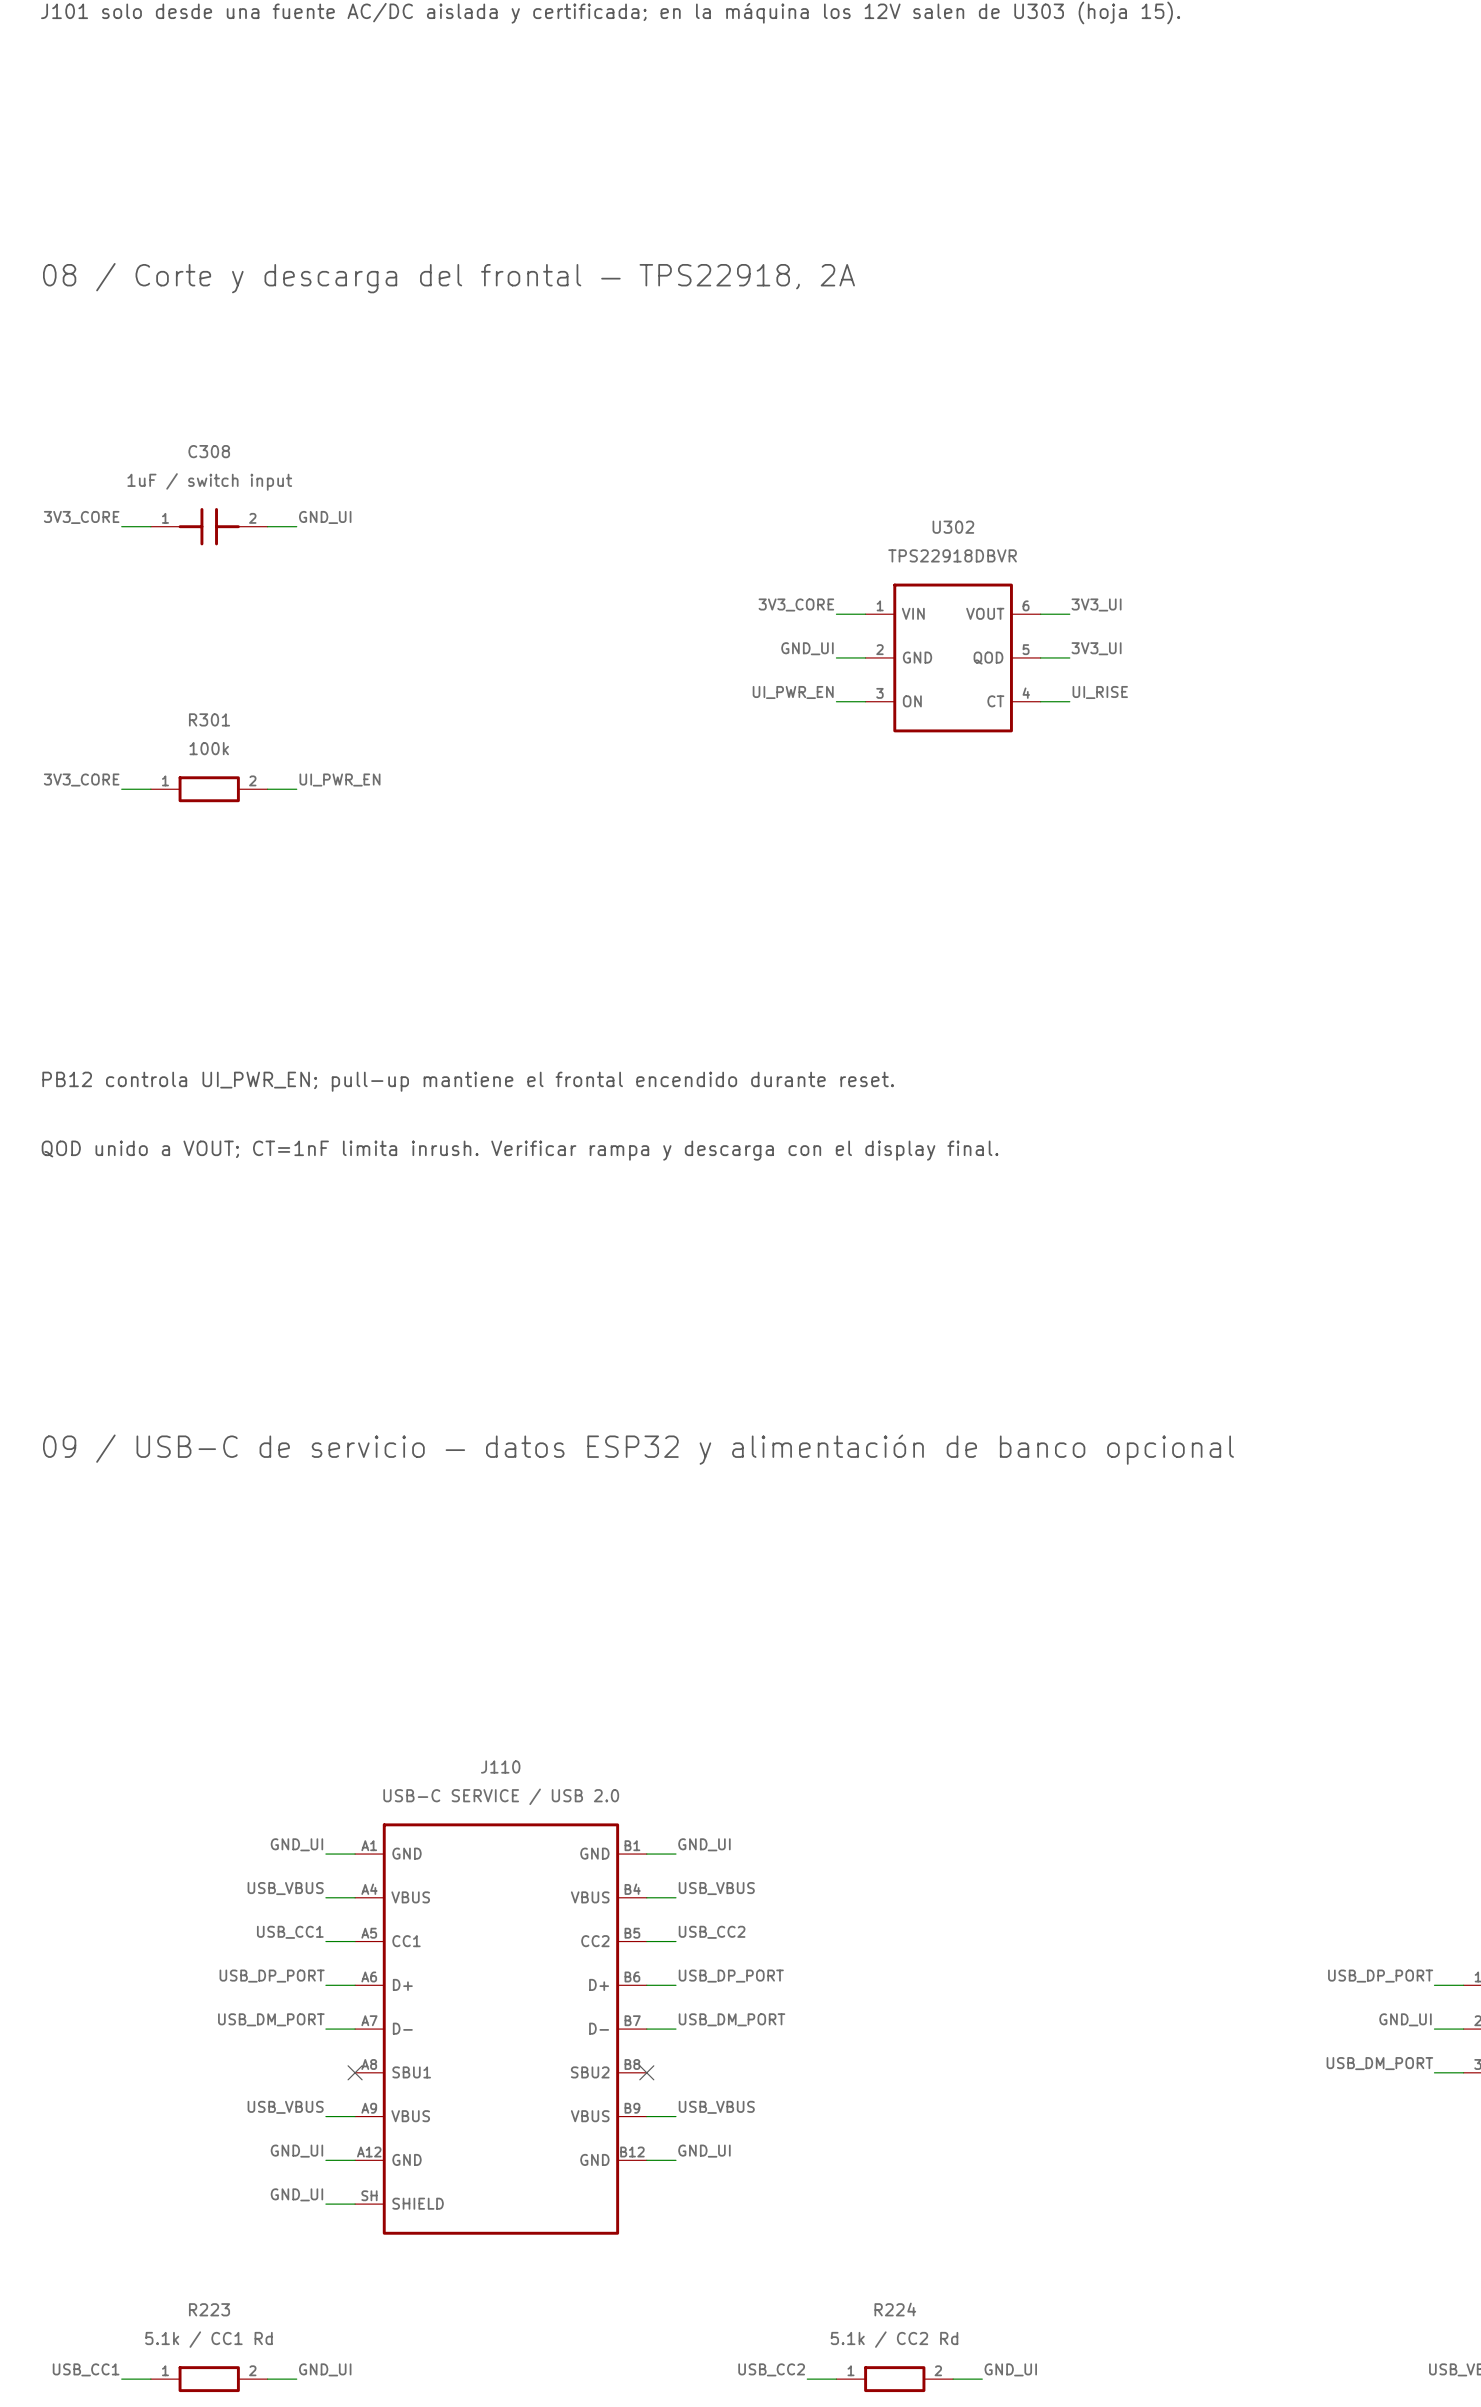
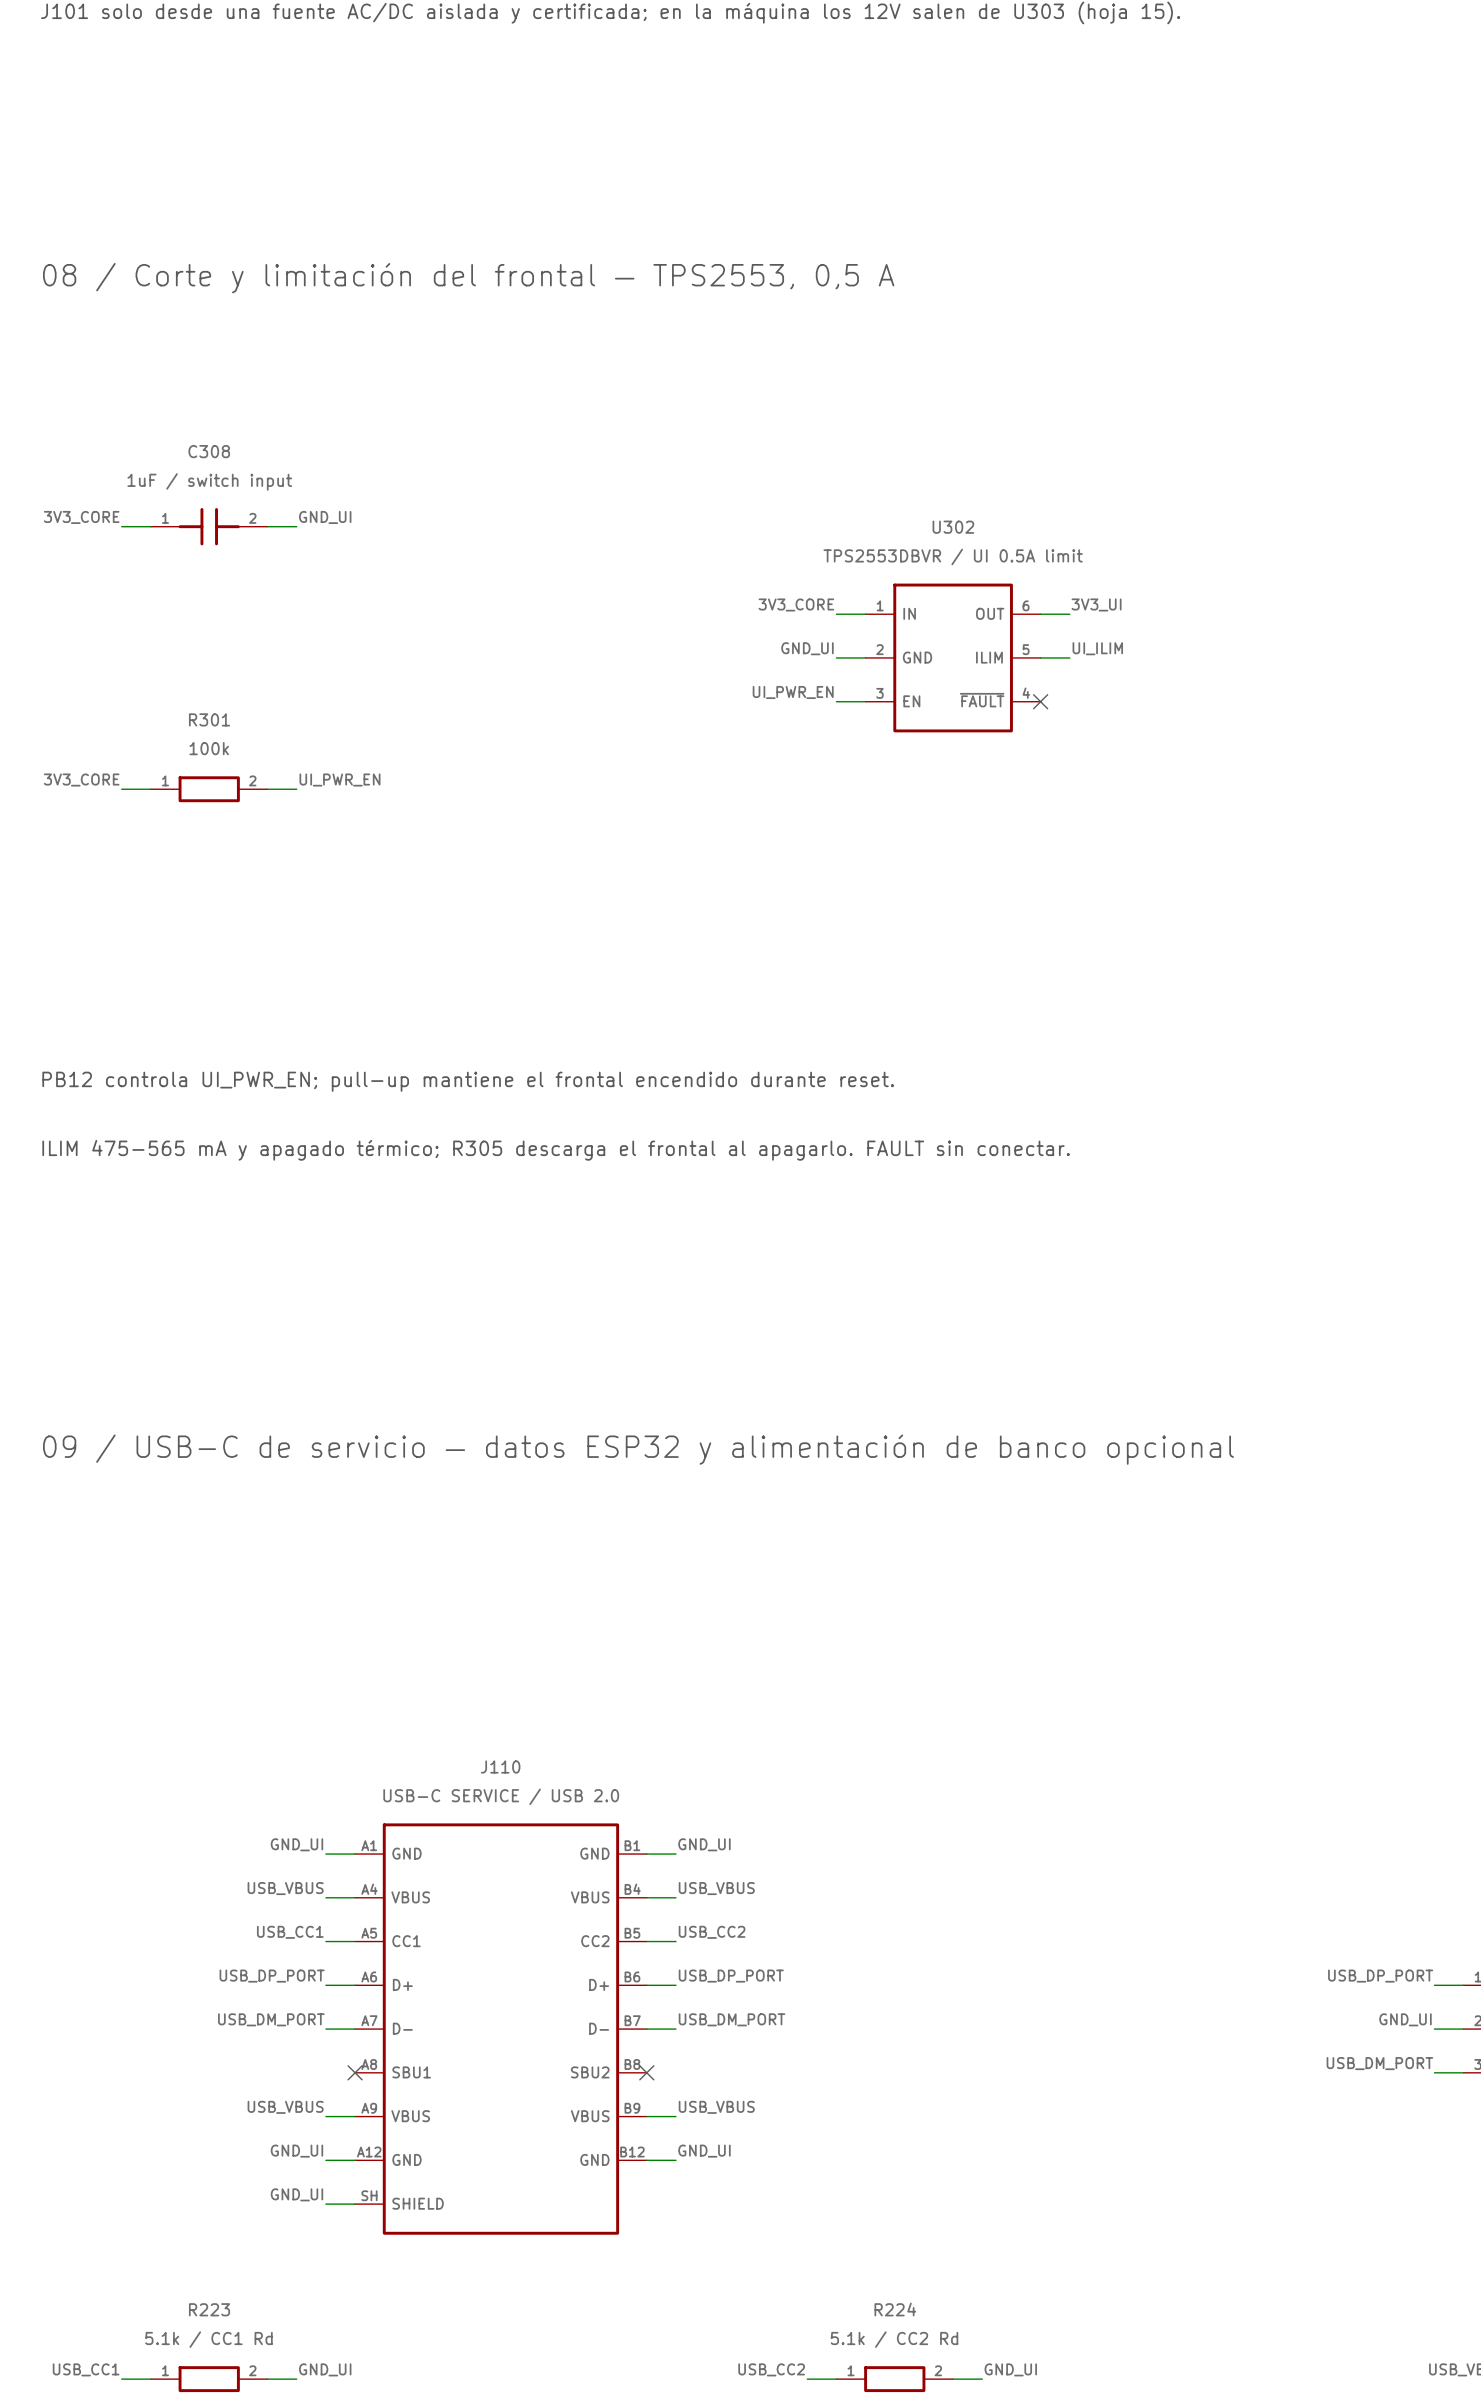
text: 08 / Corte y descarga del frontal — TPS22918, 2A (448, 278) -> 08 / Corte y limitación del frontal — TPS2553, 0,5 A (468, 278)
U302 value: TPS22918DBVR (952, 555) -> TPS2553DBVR / UI 0.5A limit (953, 556)
U302 pin name: VIN (913, 613) -> IN (909, 613)
U302 pin name: VOUT (985, 613) -> OUT (990, 613)
label: 3V3_UI (1096, 648) -> UI_ILIM (1097, 648)
U302 pin name: QOD (988, 658) -> ILIM (989, 657)
label: UI_RISE (1100, 692) -> none
U302 pin name: ON (912, 701) -> EN (911, 701)
U302 pin name: CT (995, 701) -> ~{FAULT} (982, 700)
wire: (1040, 701) (1069, 701) -> none
no-connect mark: none -> (1040, 701)
text: QOD unido a VOUT; CT=1nF limita inrush. Verificar rampa y descarga con el display final. (520, 1150) -> ILIM 475-565 mA y apagado térmico; R305 descarga el frontal al apagarlo. FAULT sin conectar. (556, 1150)

